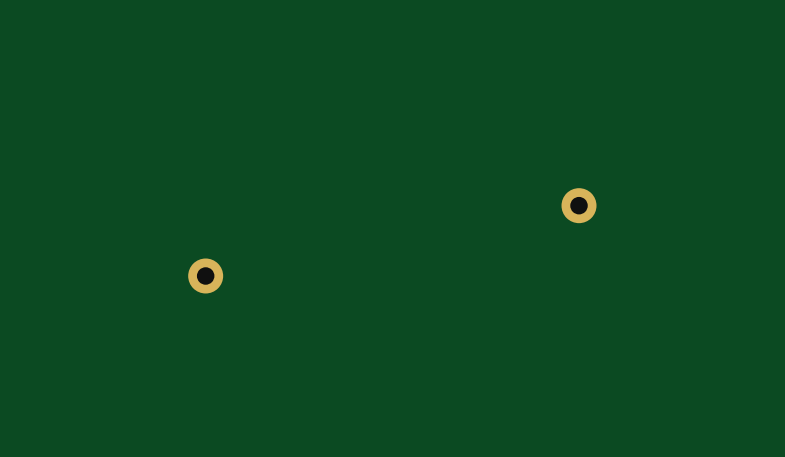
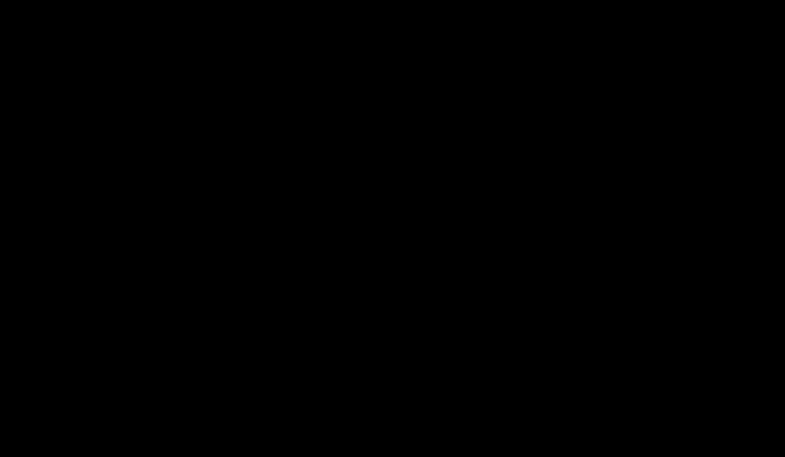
part: (579, 205) -> none
part: (205, 275) -> none

